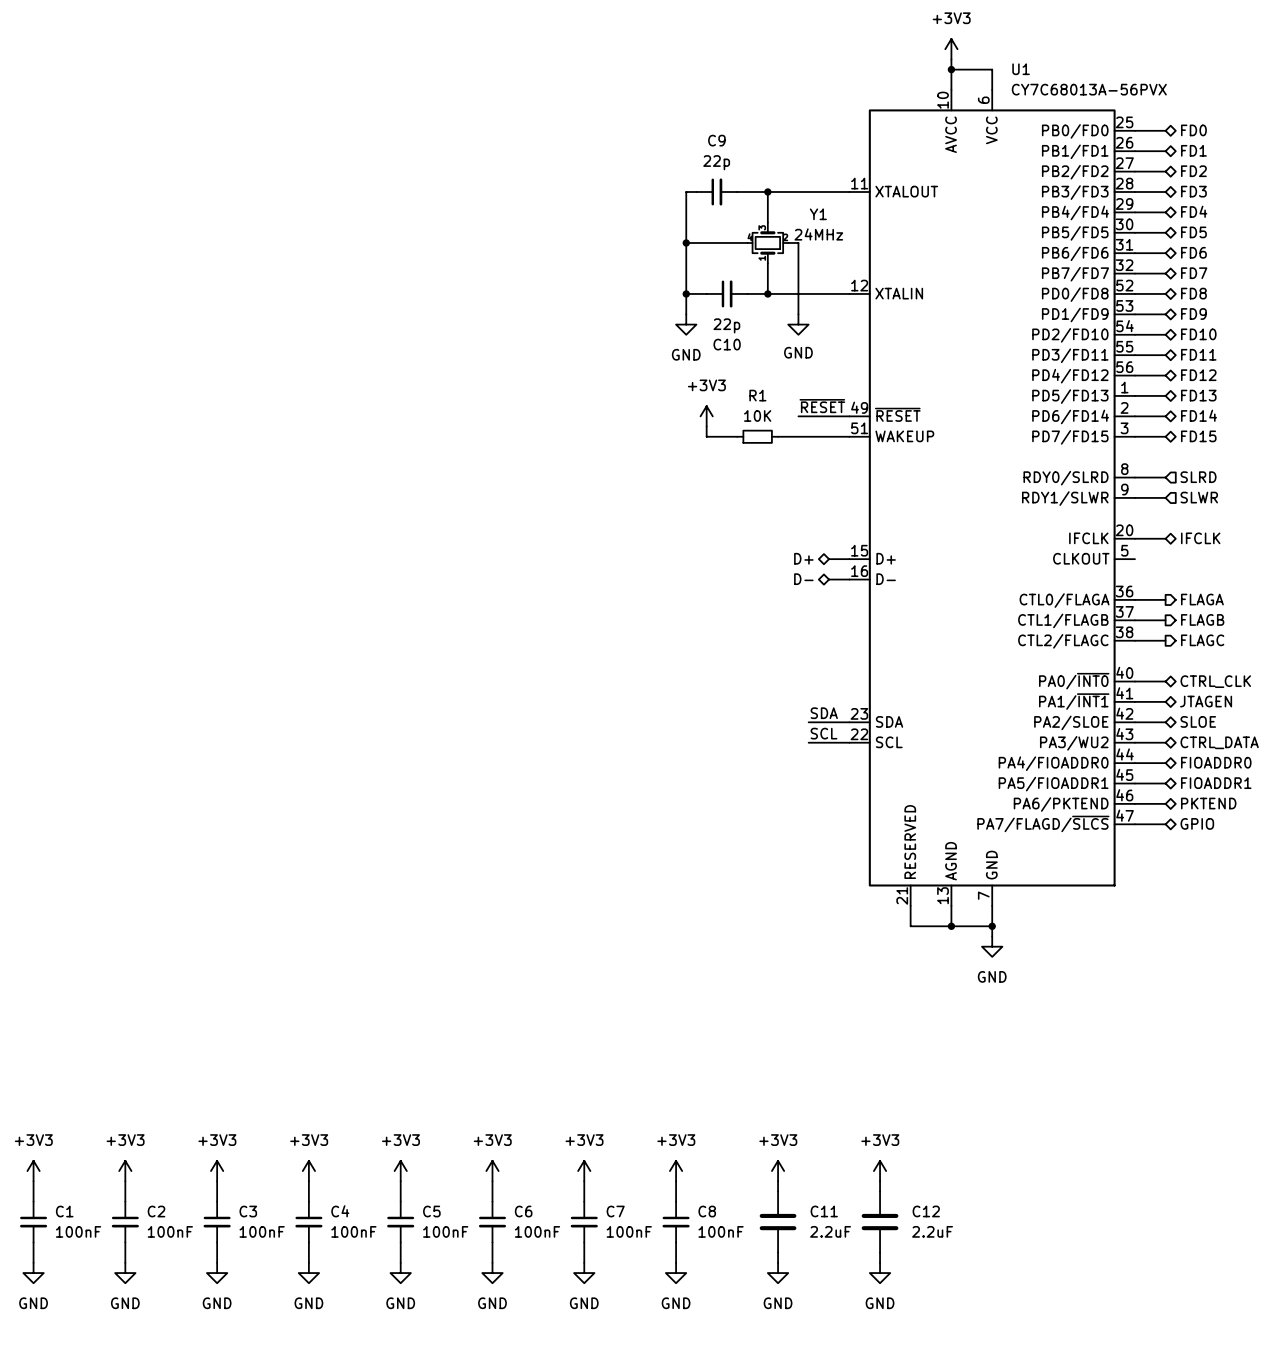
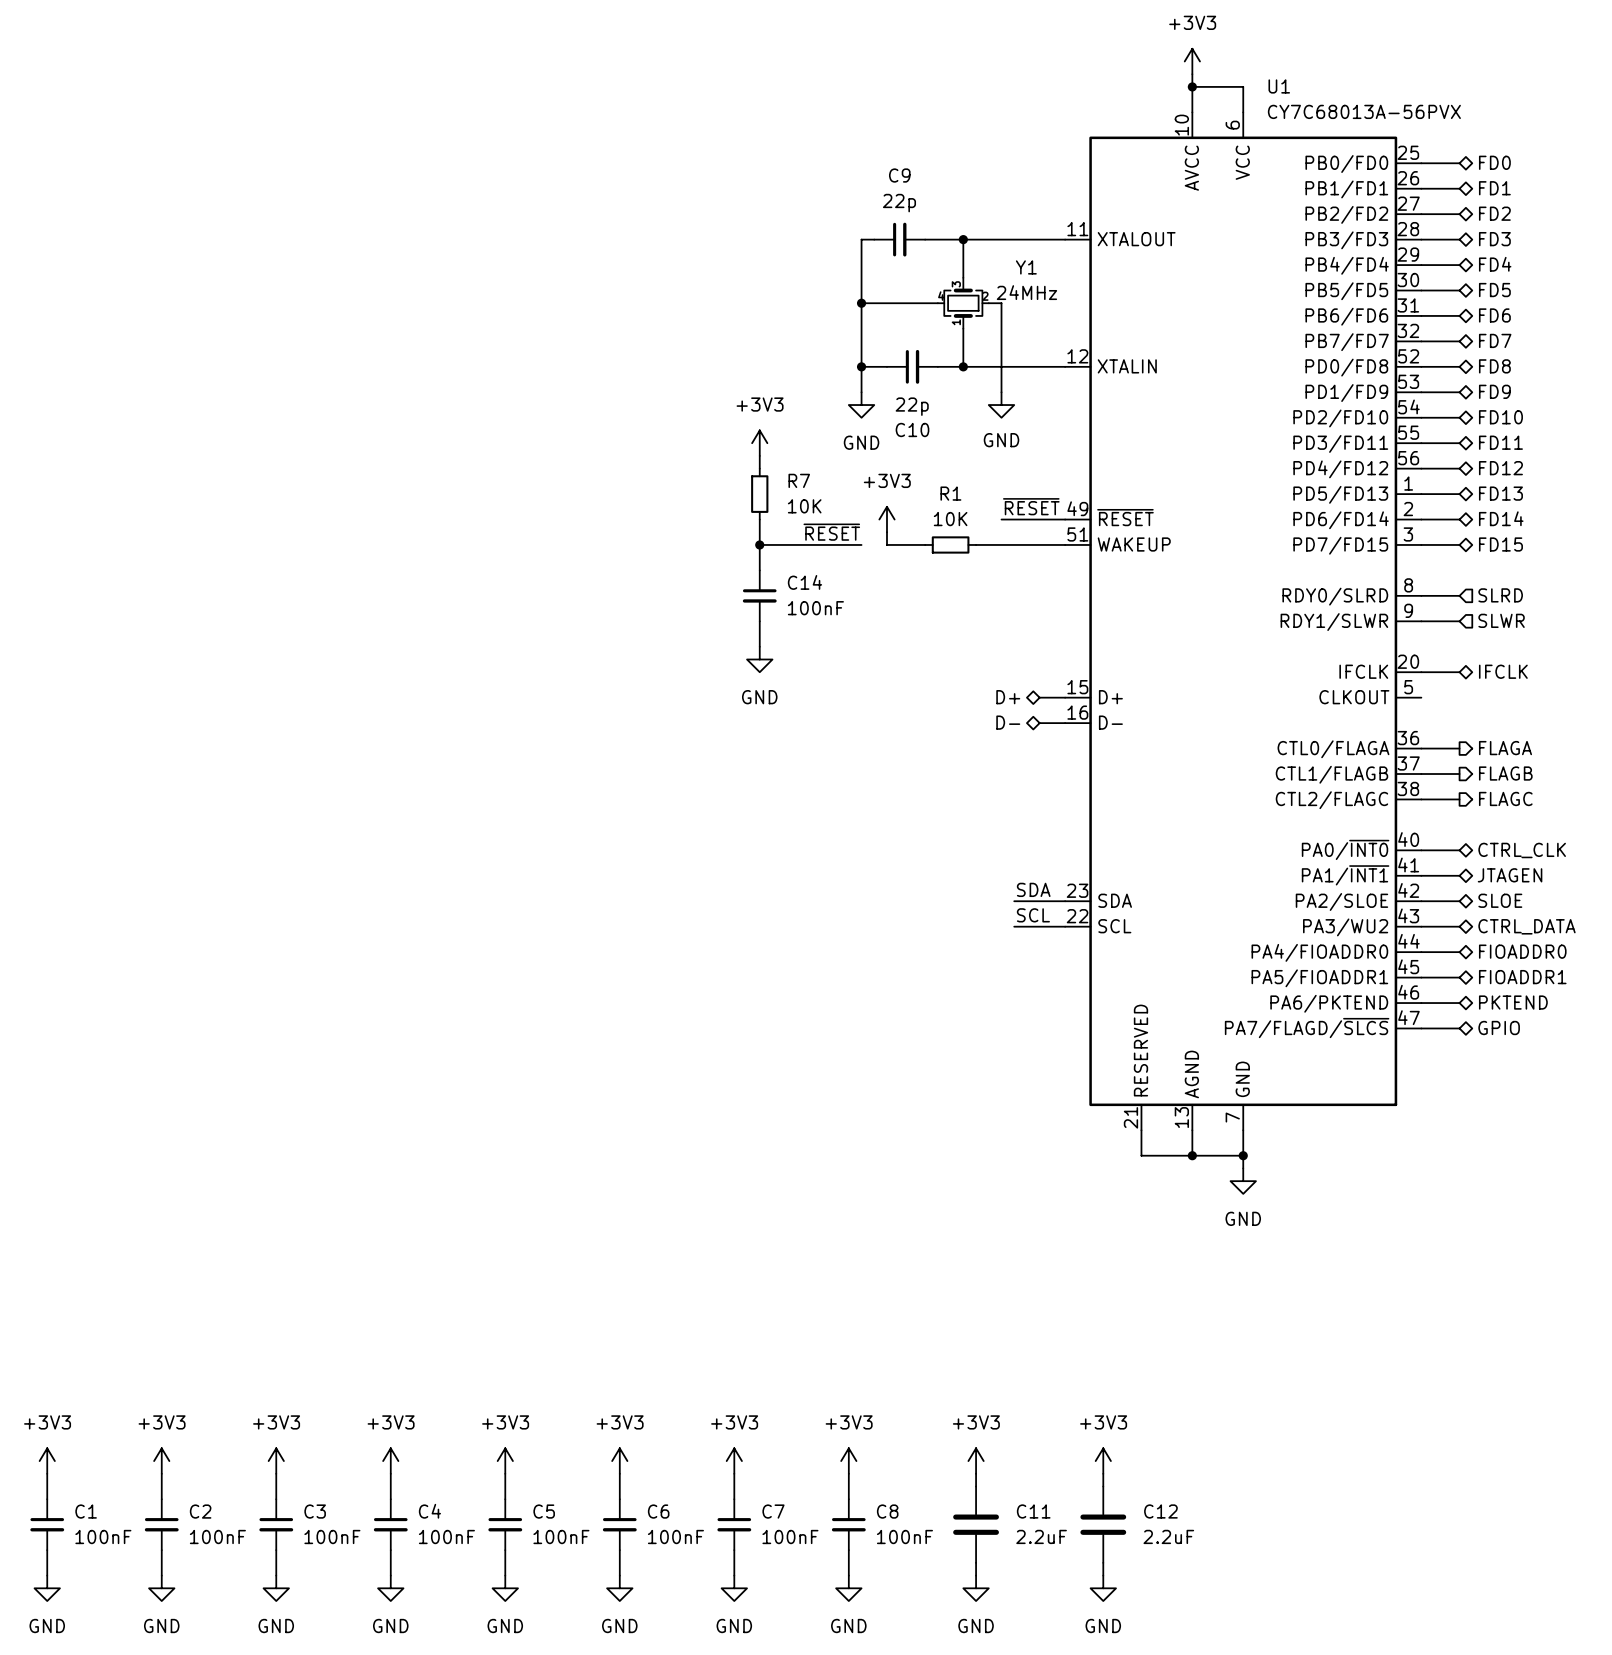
power symbol: none -> +3V3 (759, 443)
wire: none -> (759, 455) (759, 468)
R7: none -> 10K (759, 494)
wire: none -> (759, 519) (759, 570)
label: none -> ~{RESET} (831, 532)
wire: none -> (759, 544) (861, 544)
junction: none -> (759, 544)
C14: none -> 100nF (759, 595)
wire: none -> (759, 621) (759, 646)
power symbol: none -> GND (759, 659)

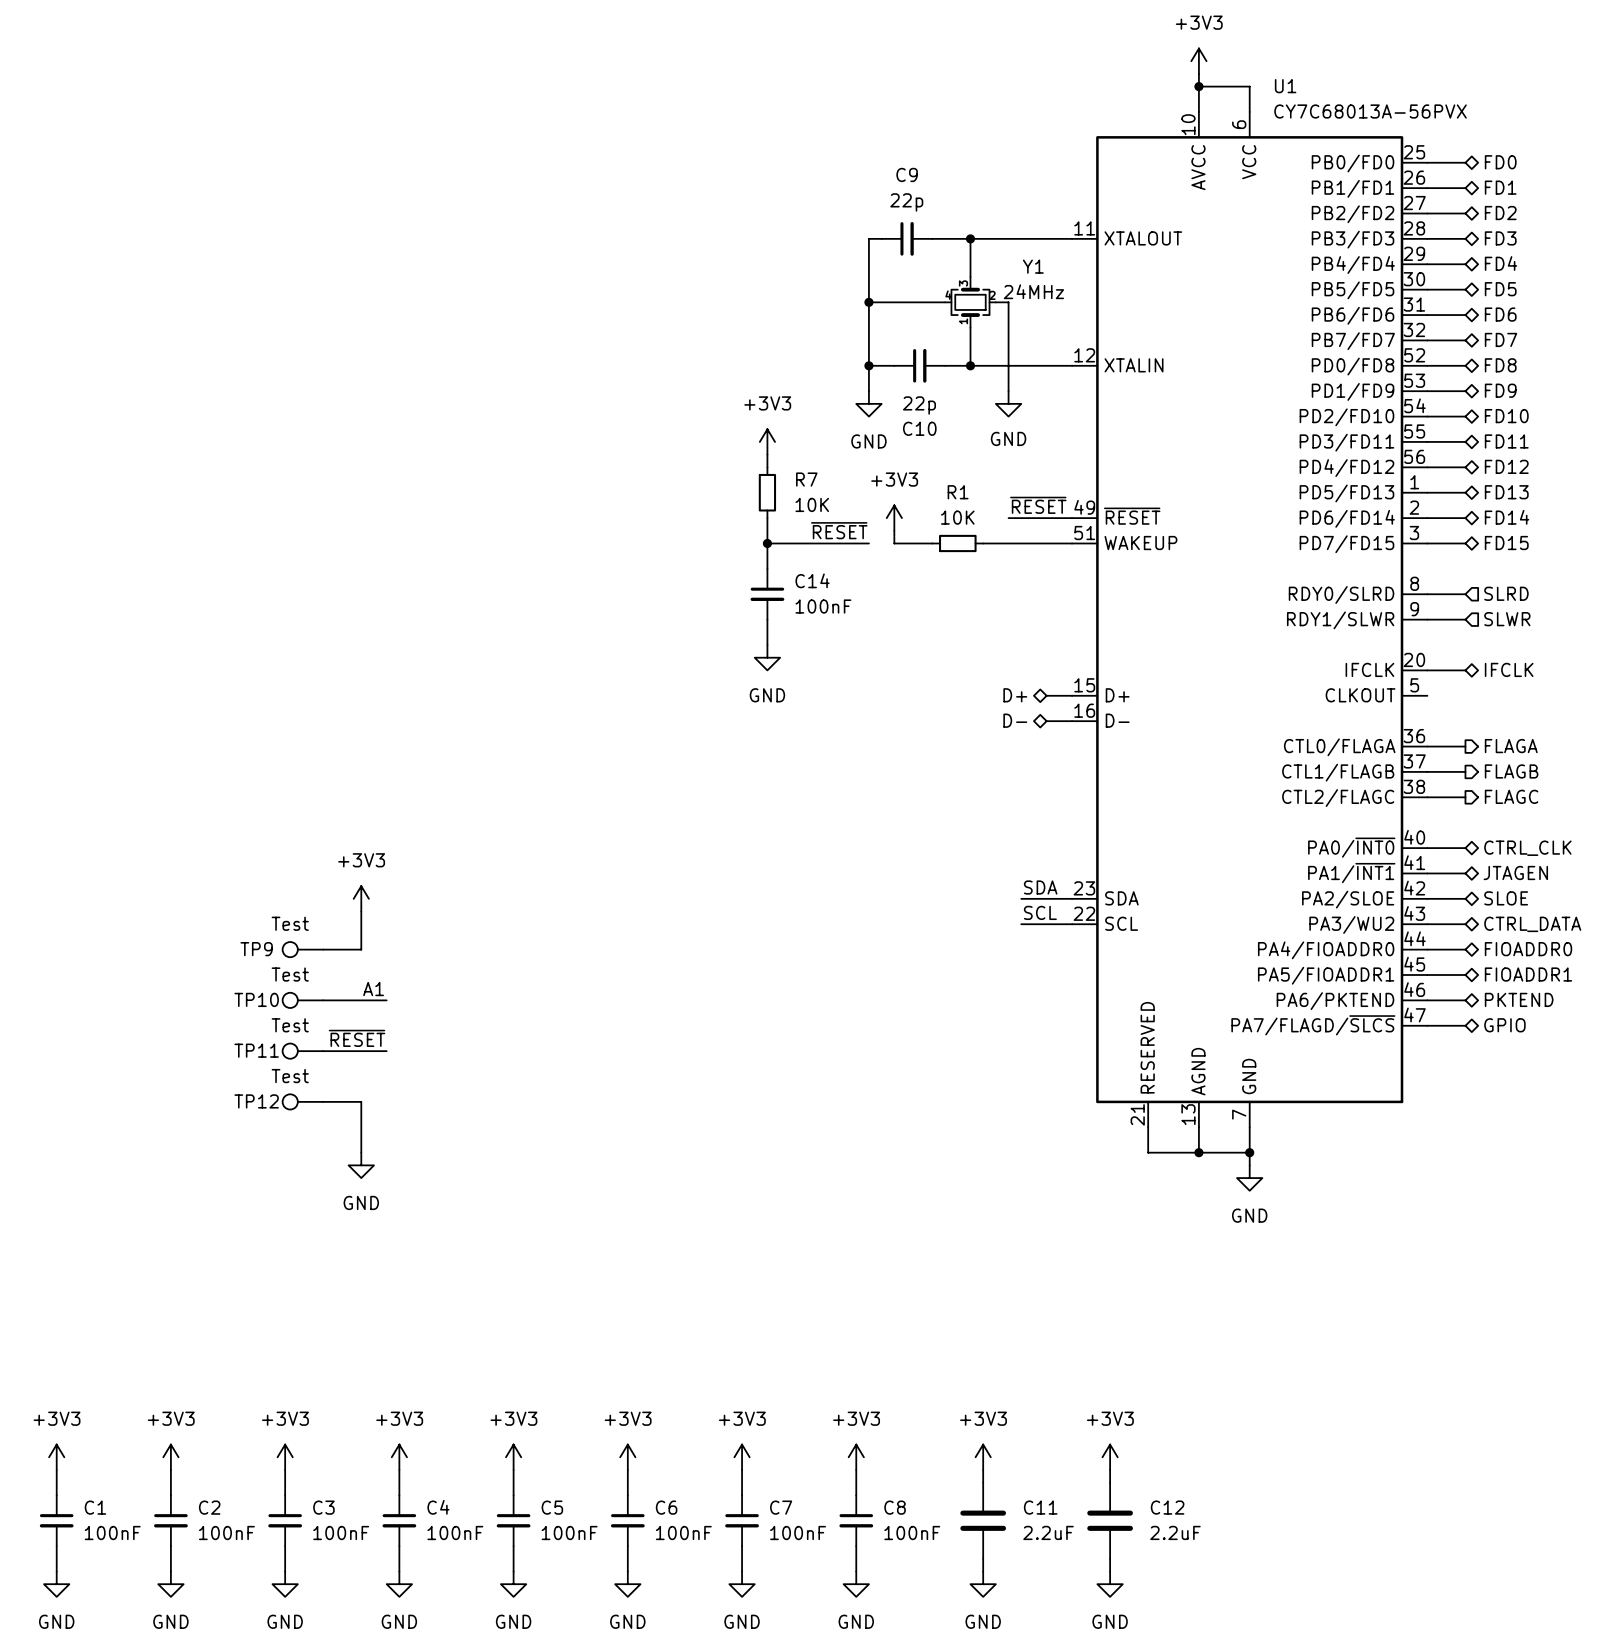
power symbol: none -> +3V3 (361, 898)
wire: none -> (361, 911) (361, 949) (323, 949)
TP9: none -> Test (302, 949)
label: none -> A1 (373, 989)
TP10: none -> Test (302, 1000)
wire: none -> (323, 1000) (386, 1000)
label: none -> ~{RESET} (357, 1038)
TP11: none -> Test (302, 1051)
wire: none -> (323, 1051) (386, 1051)
TP12: none -> Test (302, 1101)
wire: none -> (323, 1101) (361, 1101) (361, 1152)
power symbol: none -> GND (361, 1165)

